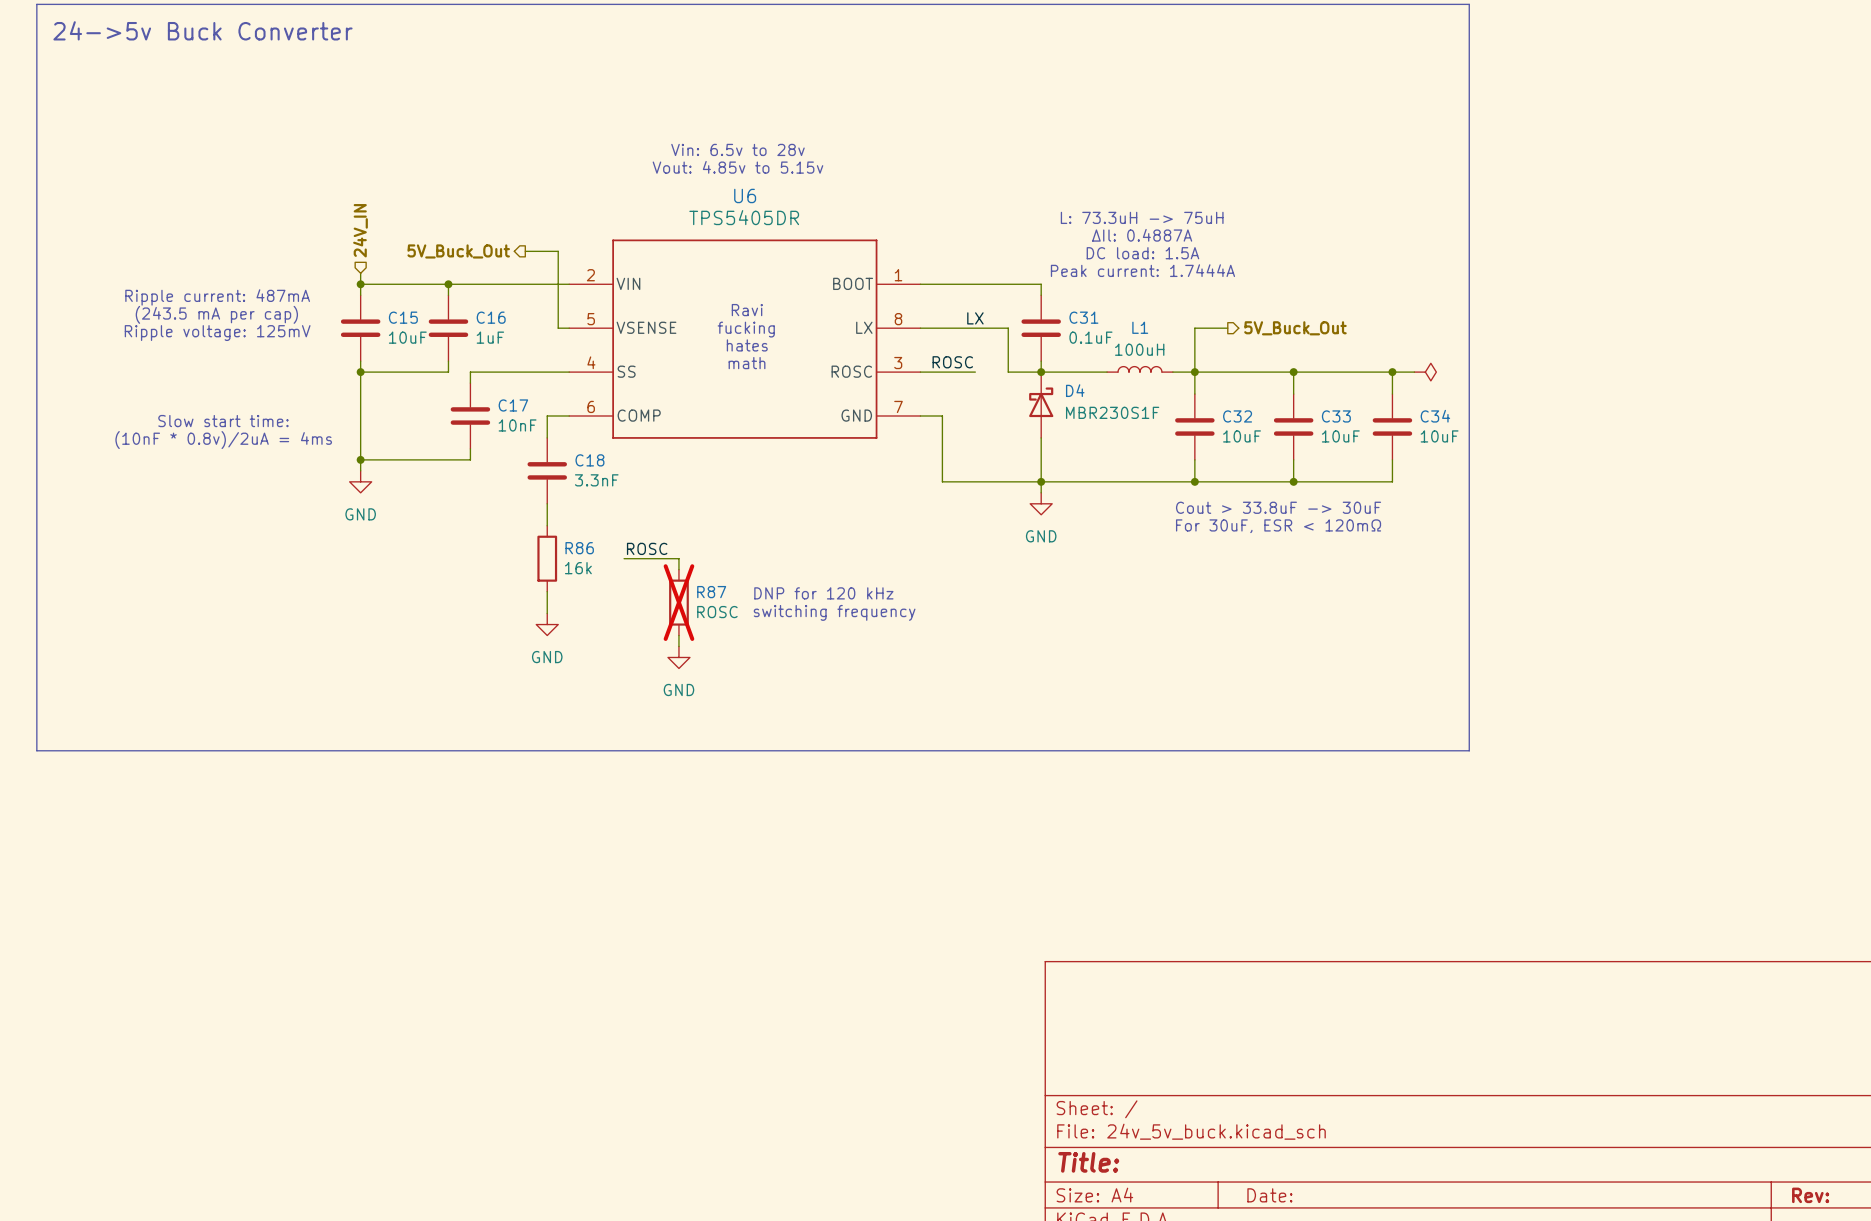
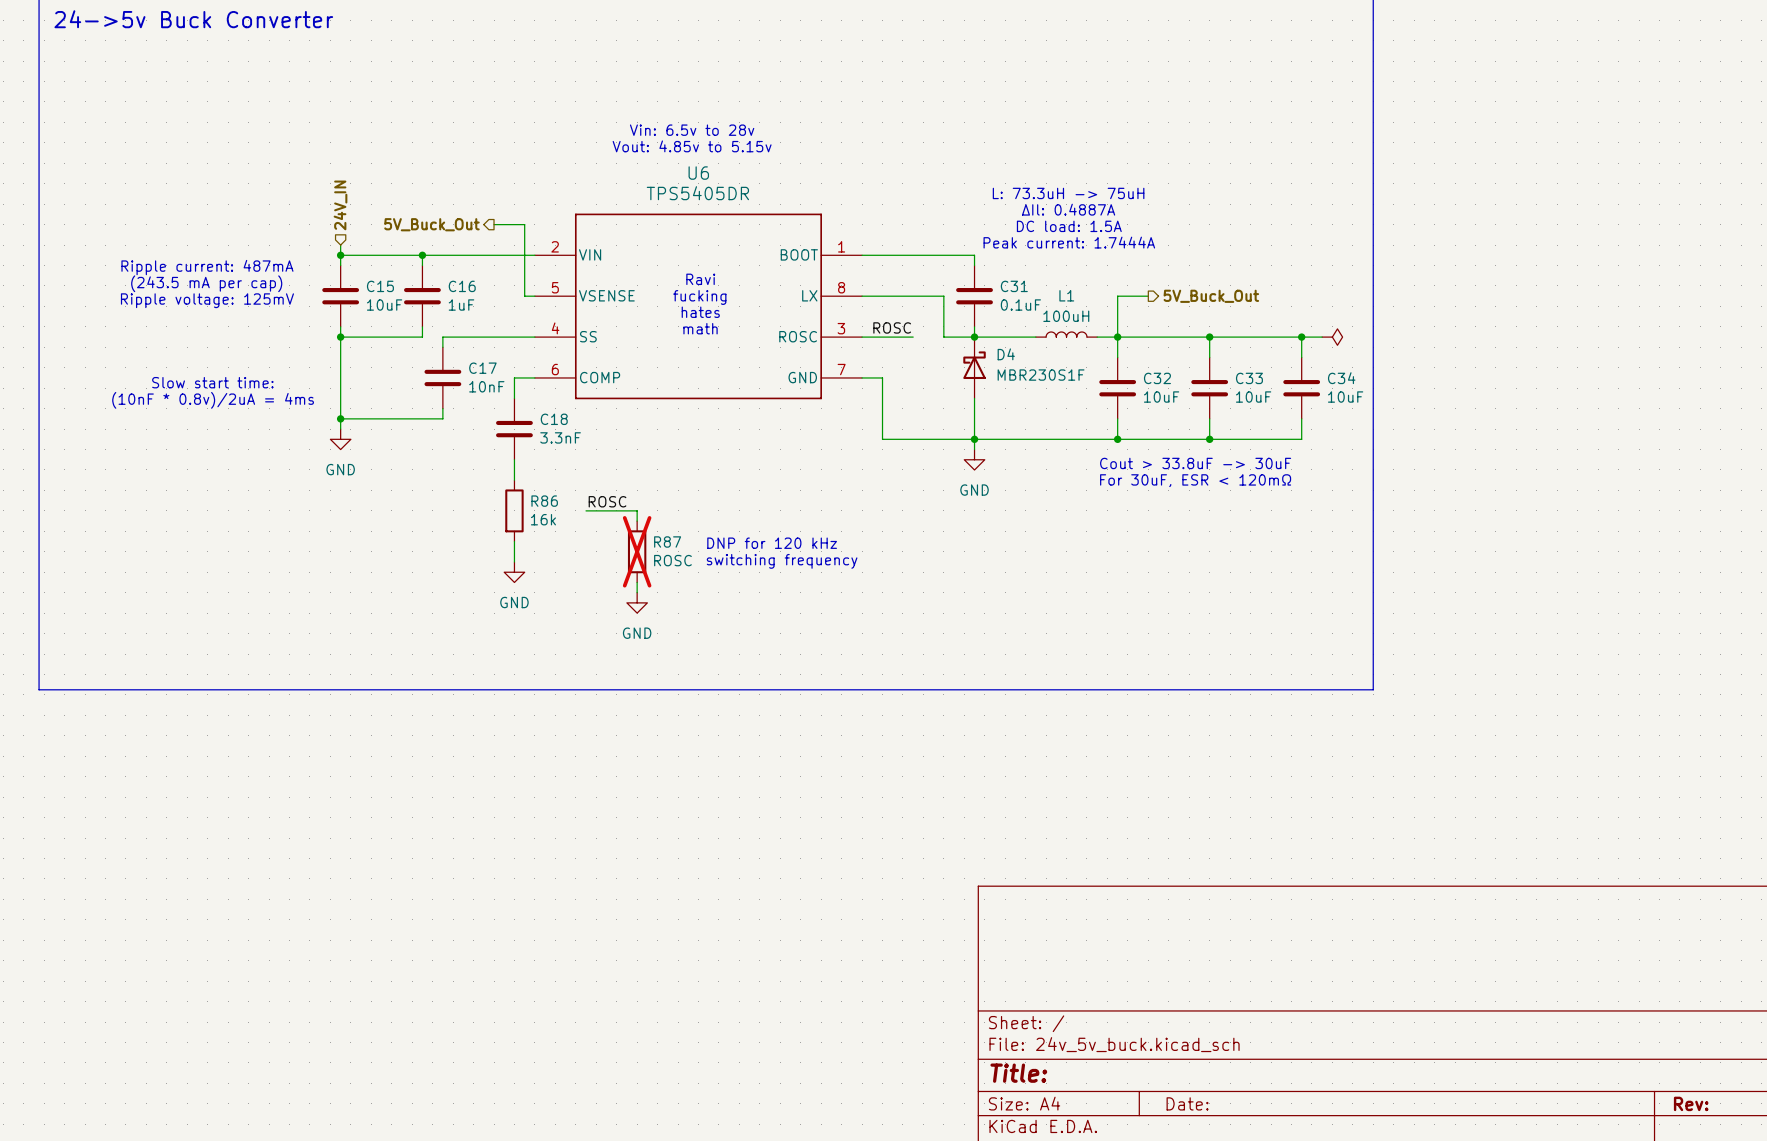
label: LX (975, 318) -> none

